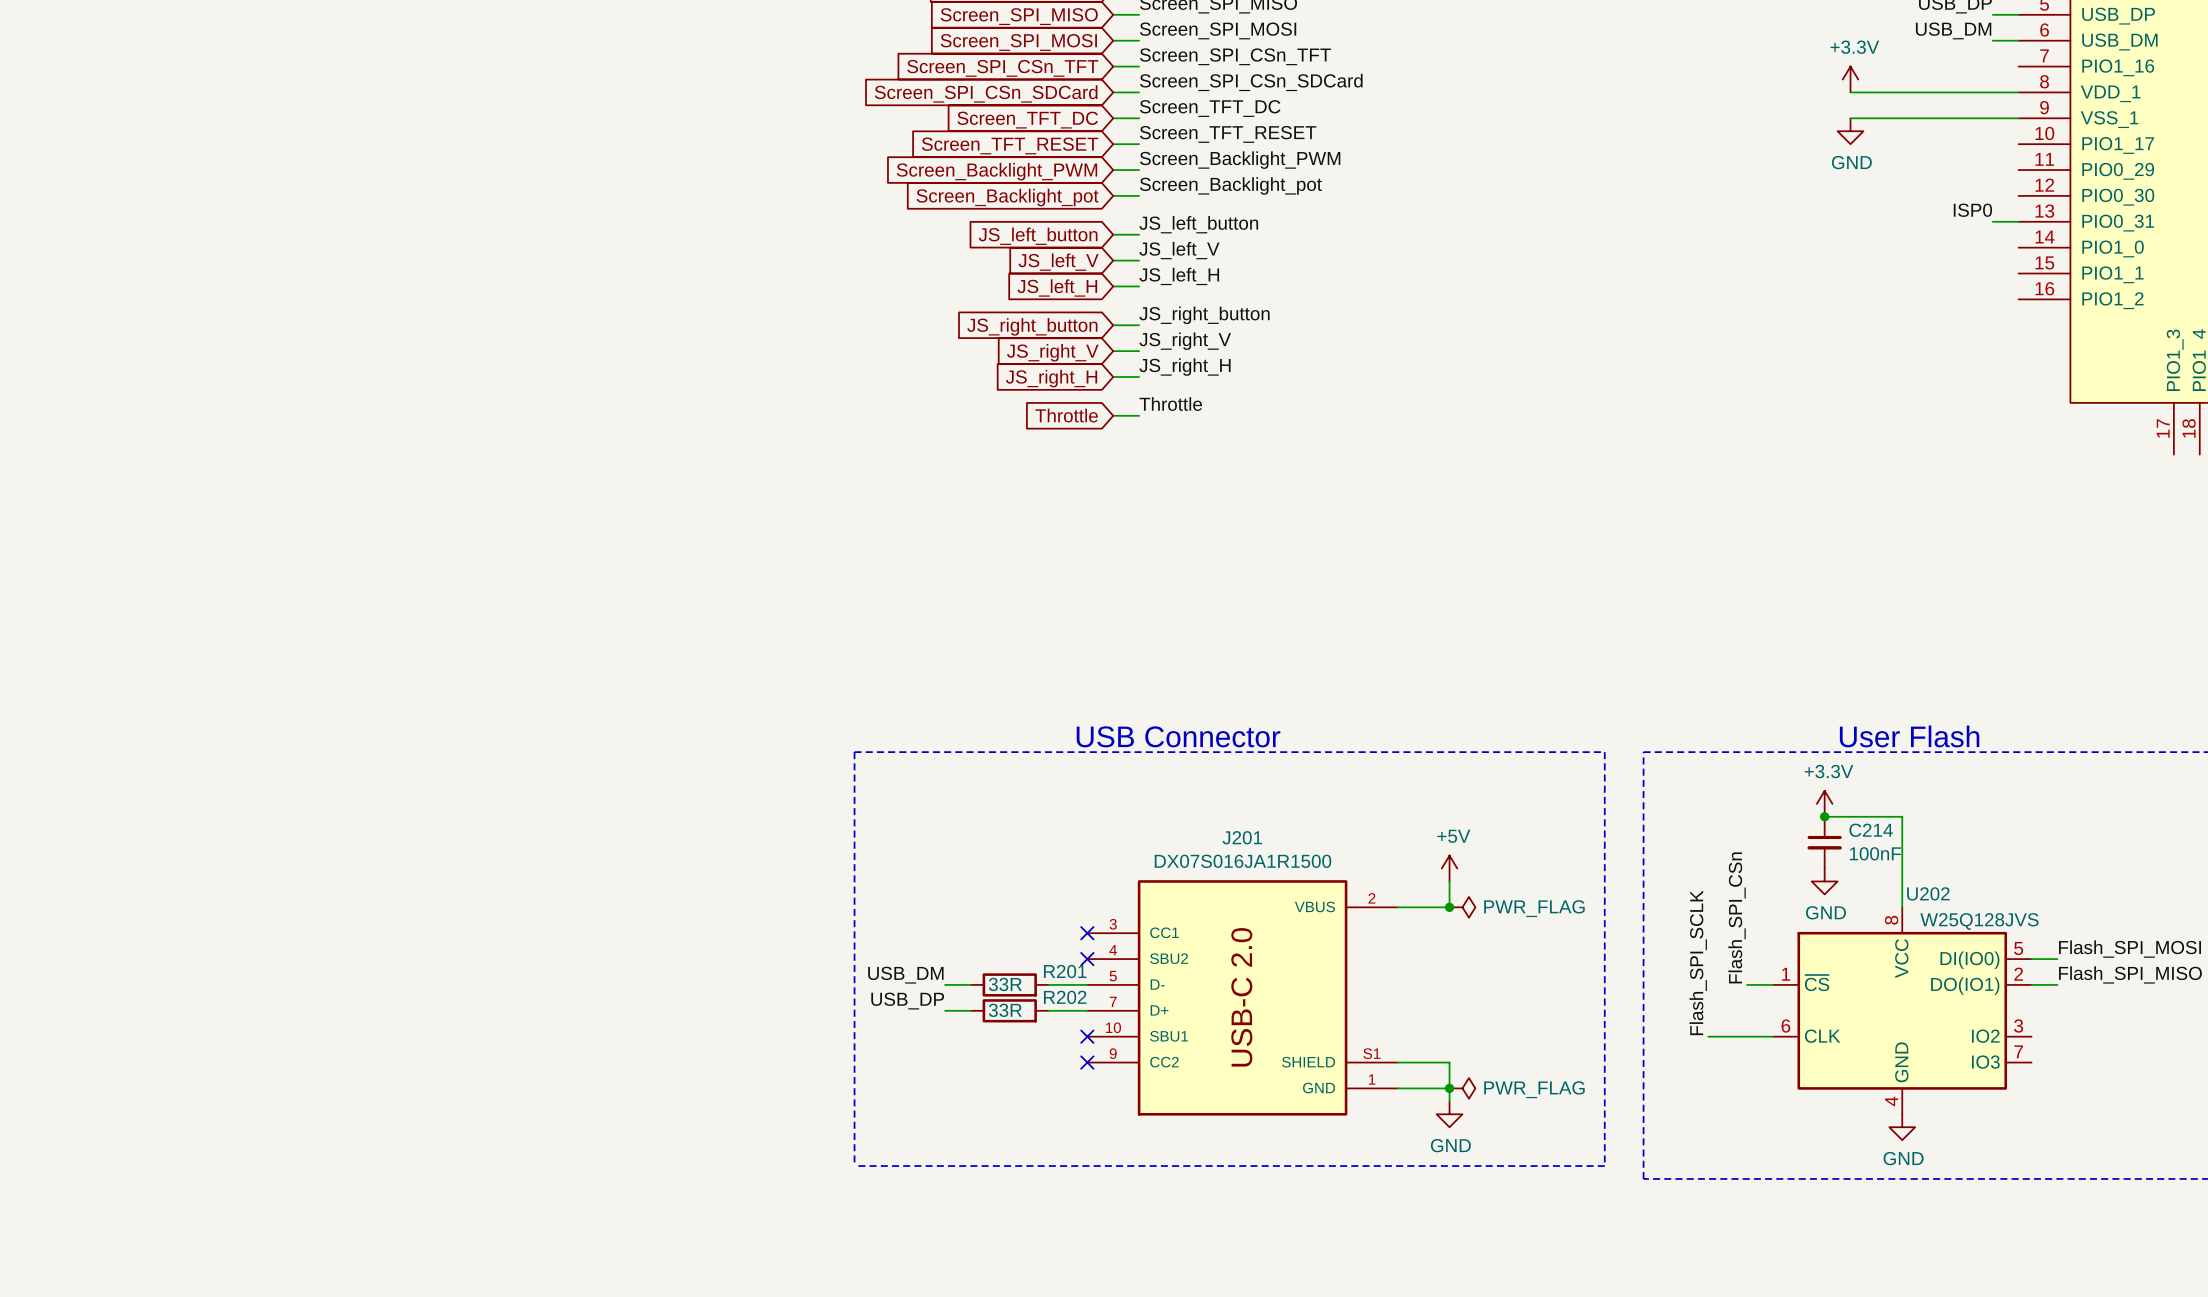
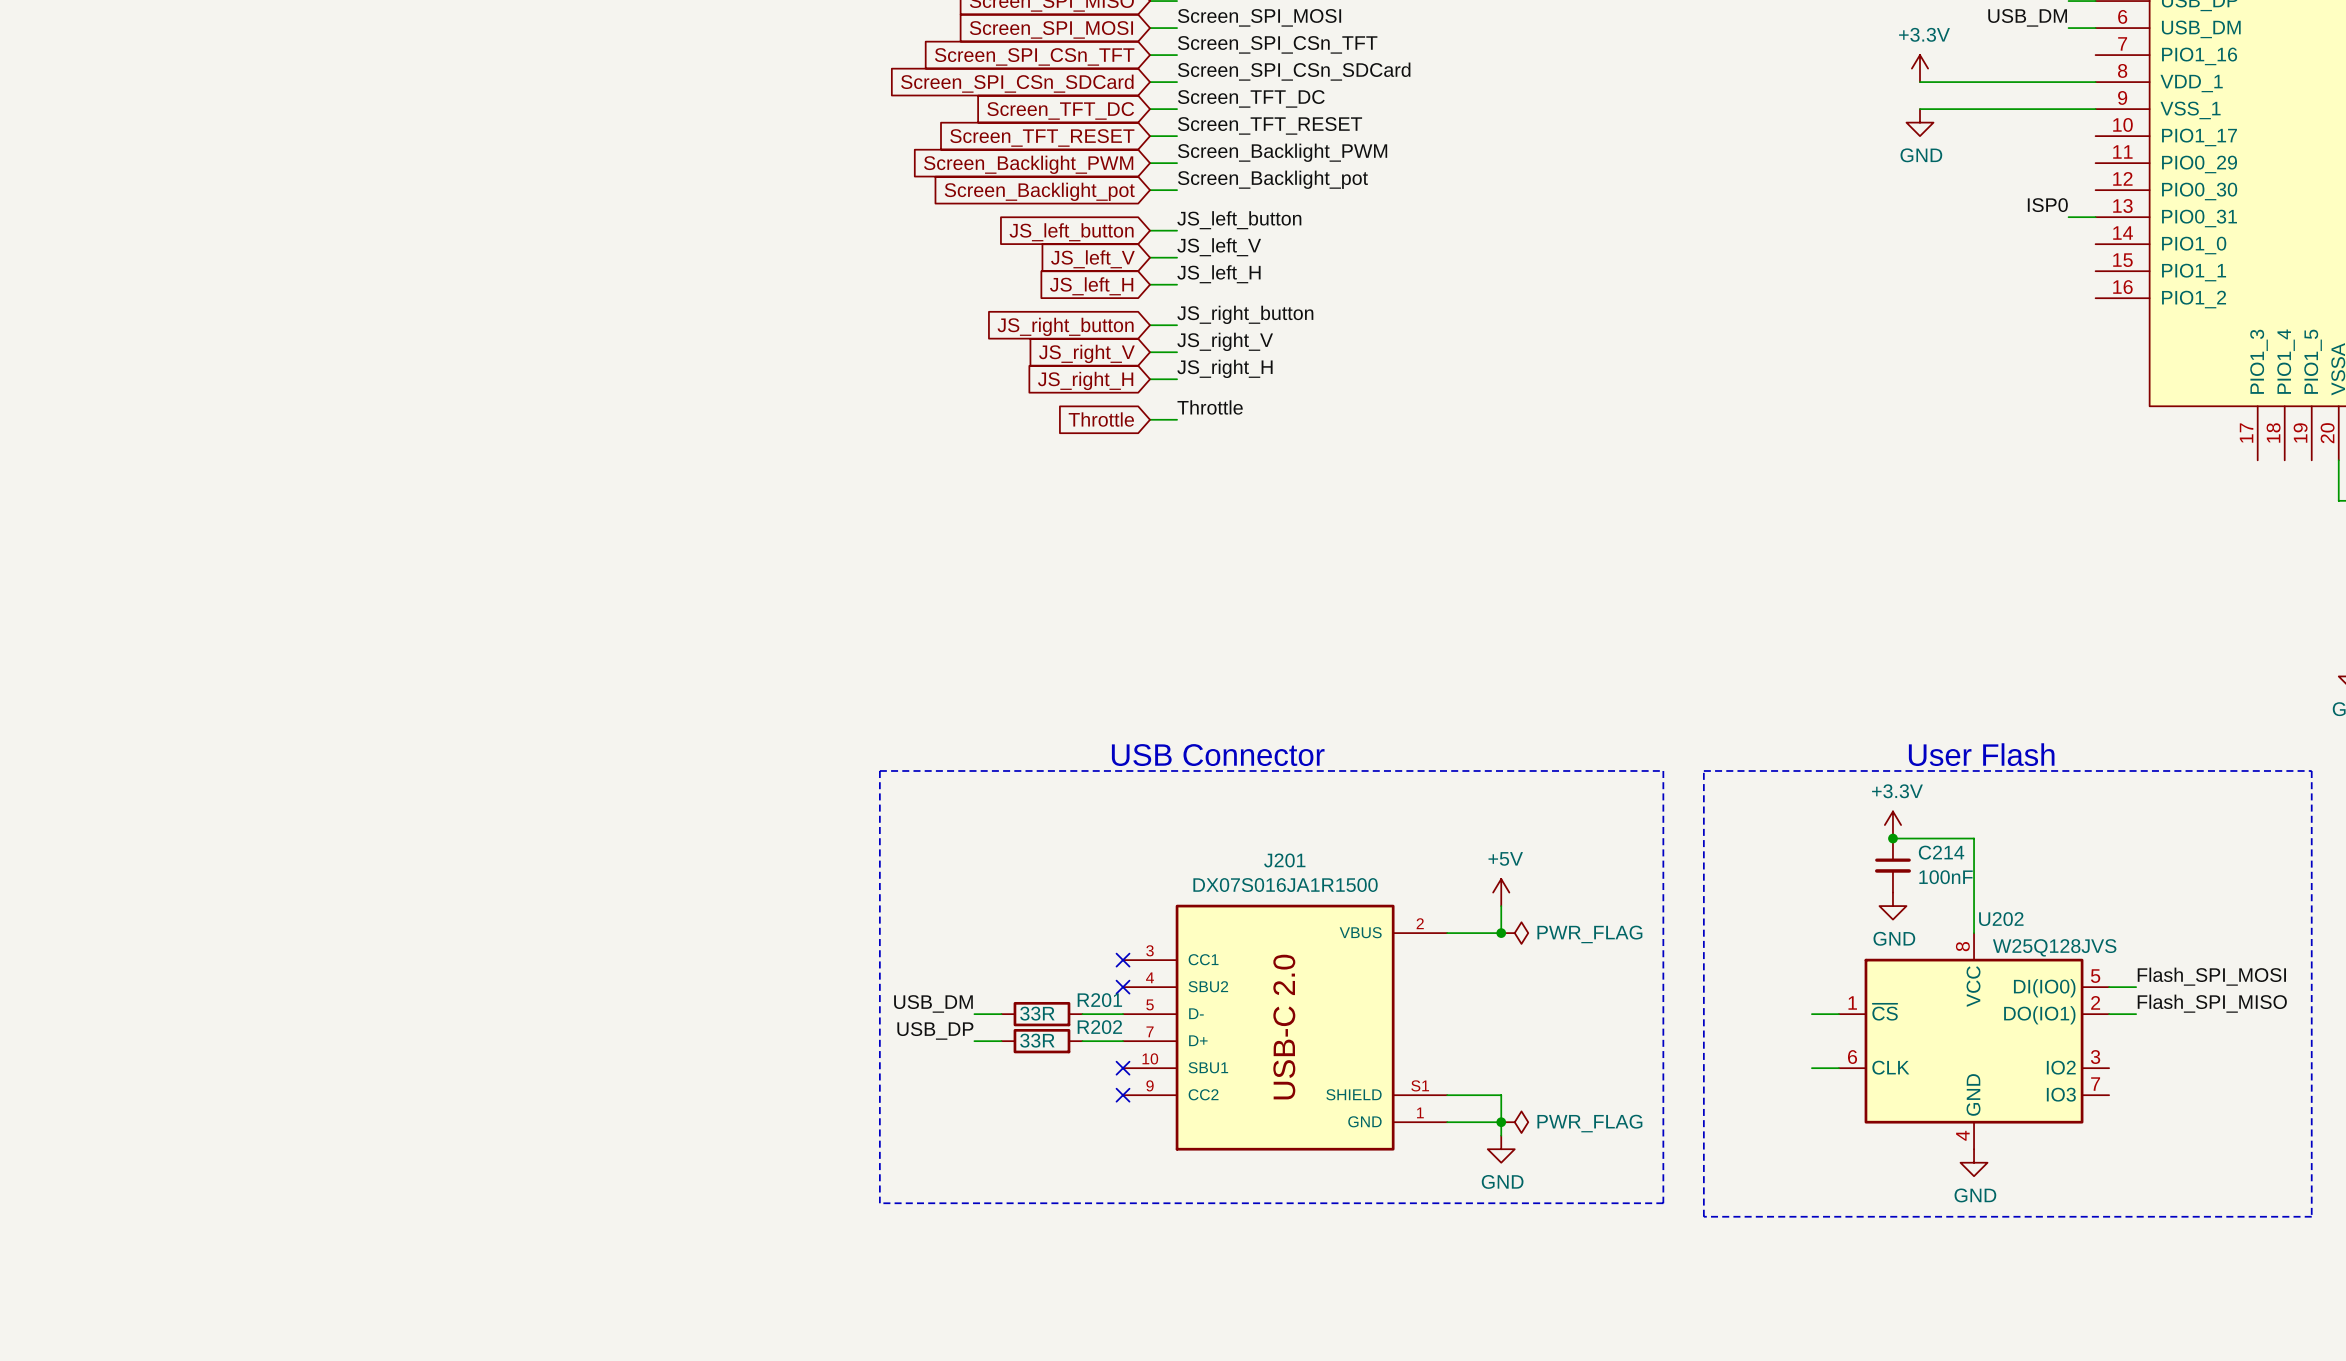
label: Flash_SPI_CSn (1737, 917) -> none
label: Flash_SPI_SCLK (1698, 962) -> none
wire: (1708, 1036) (1747, 1036) -> none

